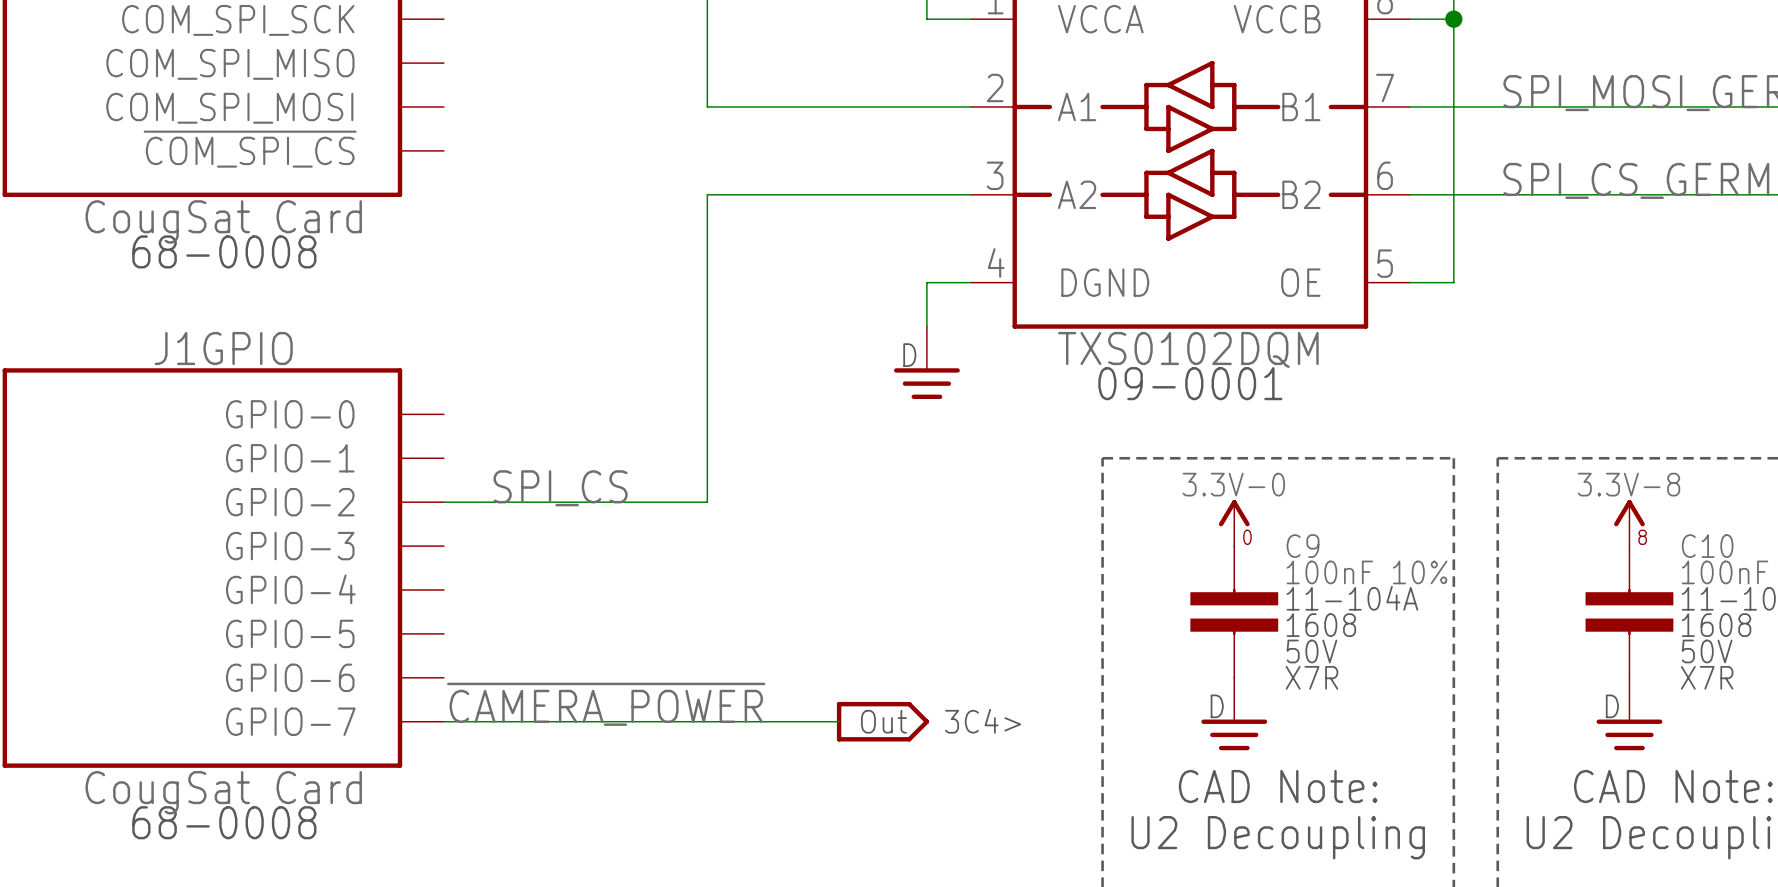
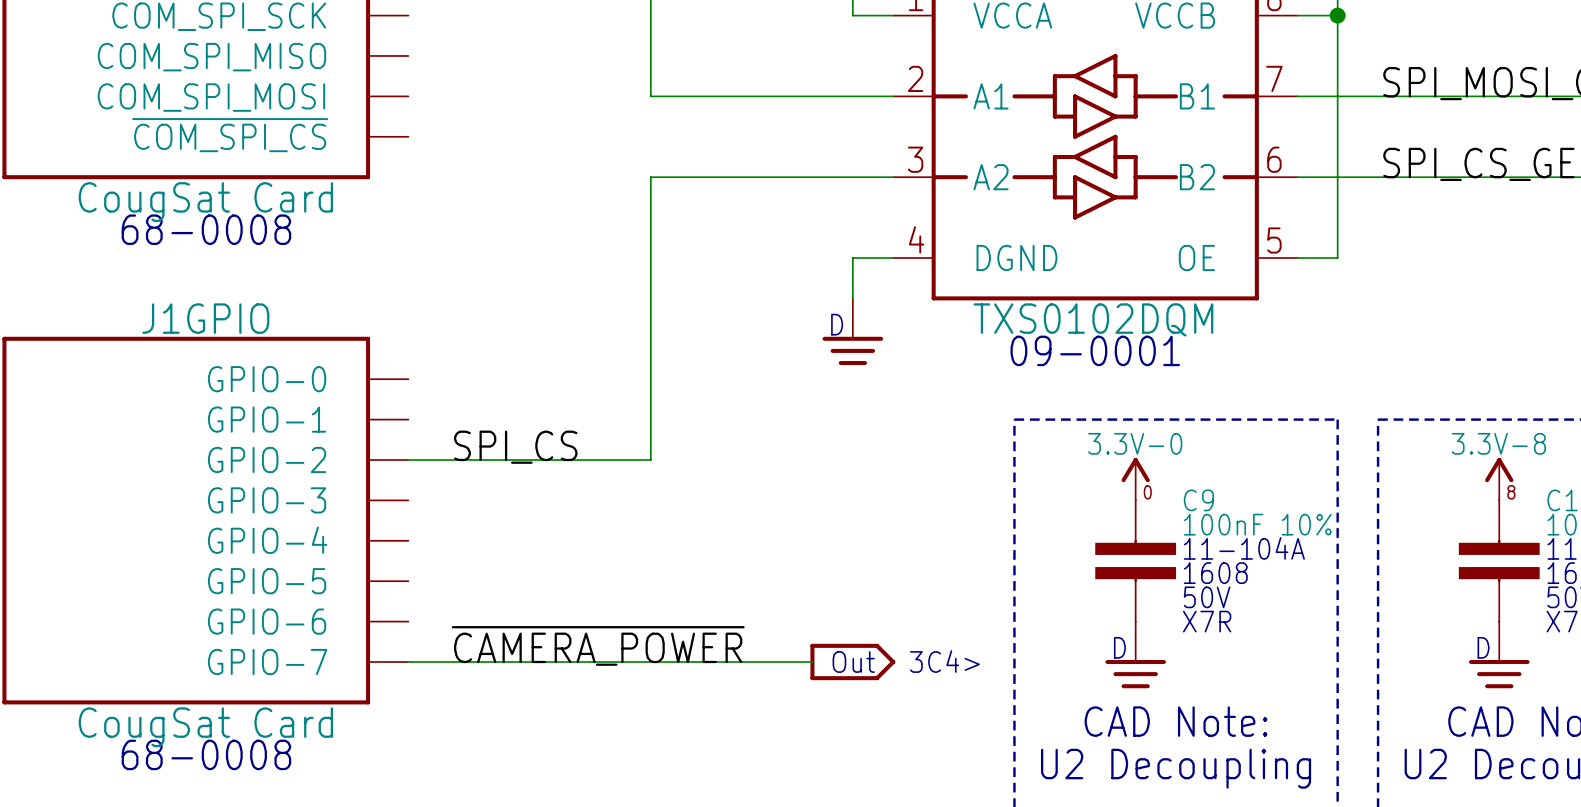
label position: ~{CAMERA_POWER} (606, 704) -> ~{CAMERA_POWER} (598, 645)
wire: none -> (772, 661) (812, 661)
part position: (883, 721) -> (852, 661)
text position: 3C4> (983, 721) -> 3C4> (944, 661)

